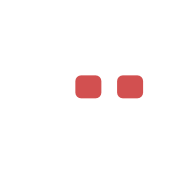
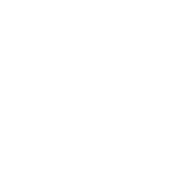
part: (109, 86) -> none

